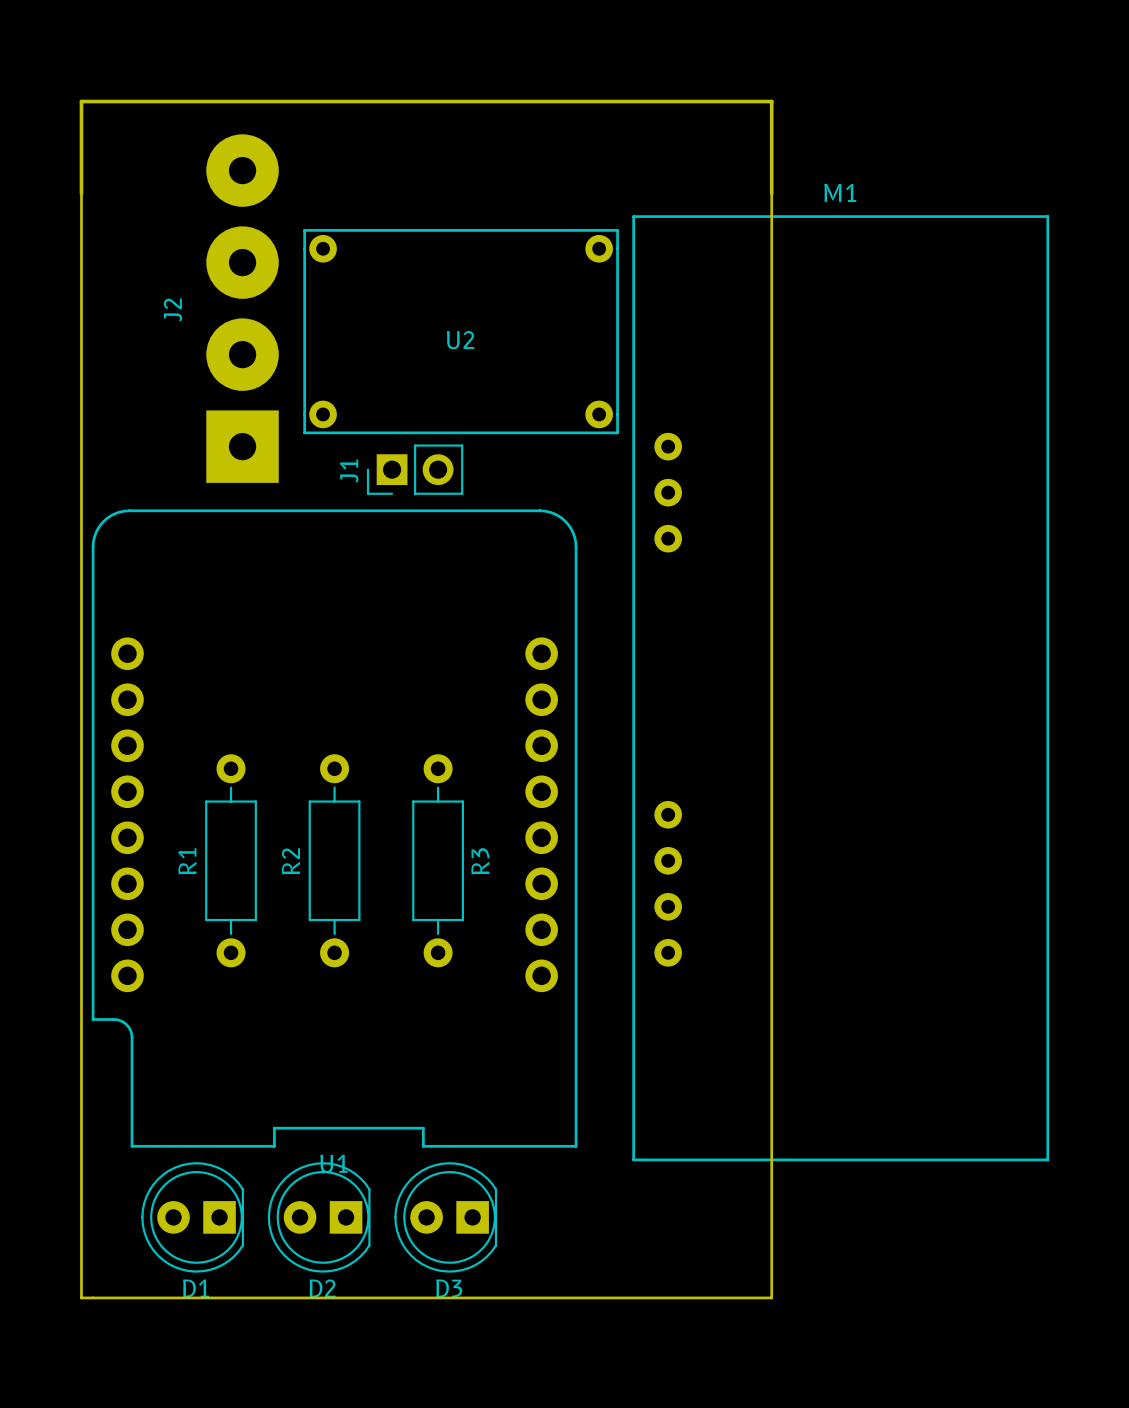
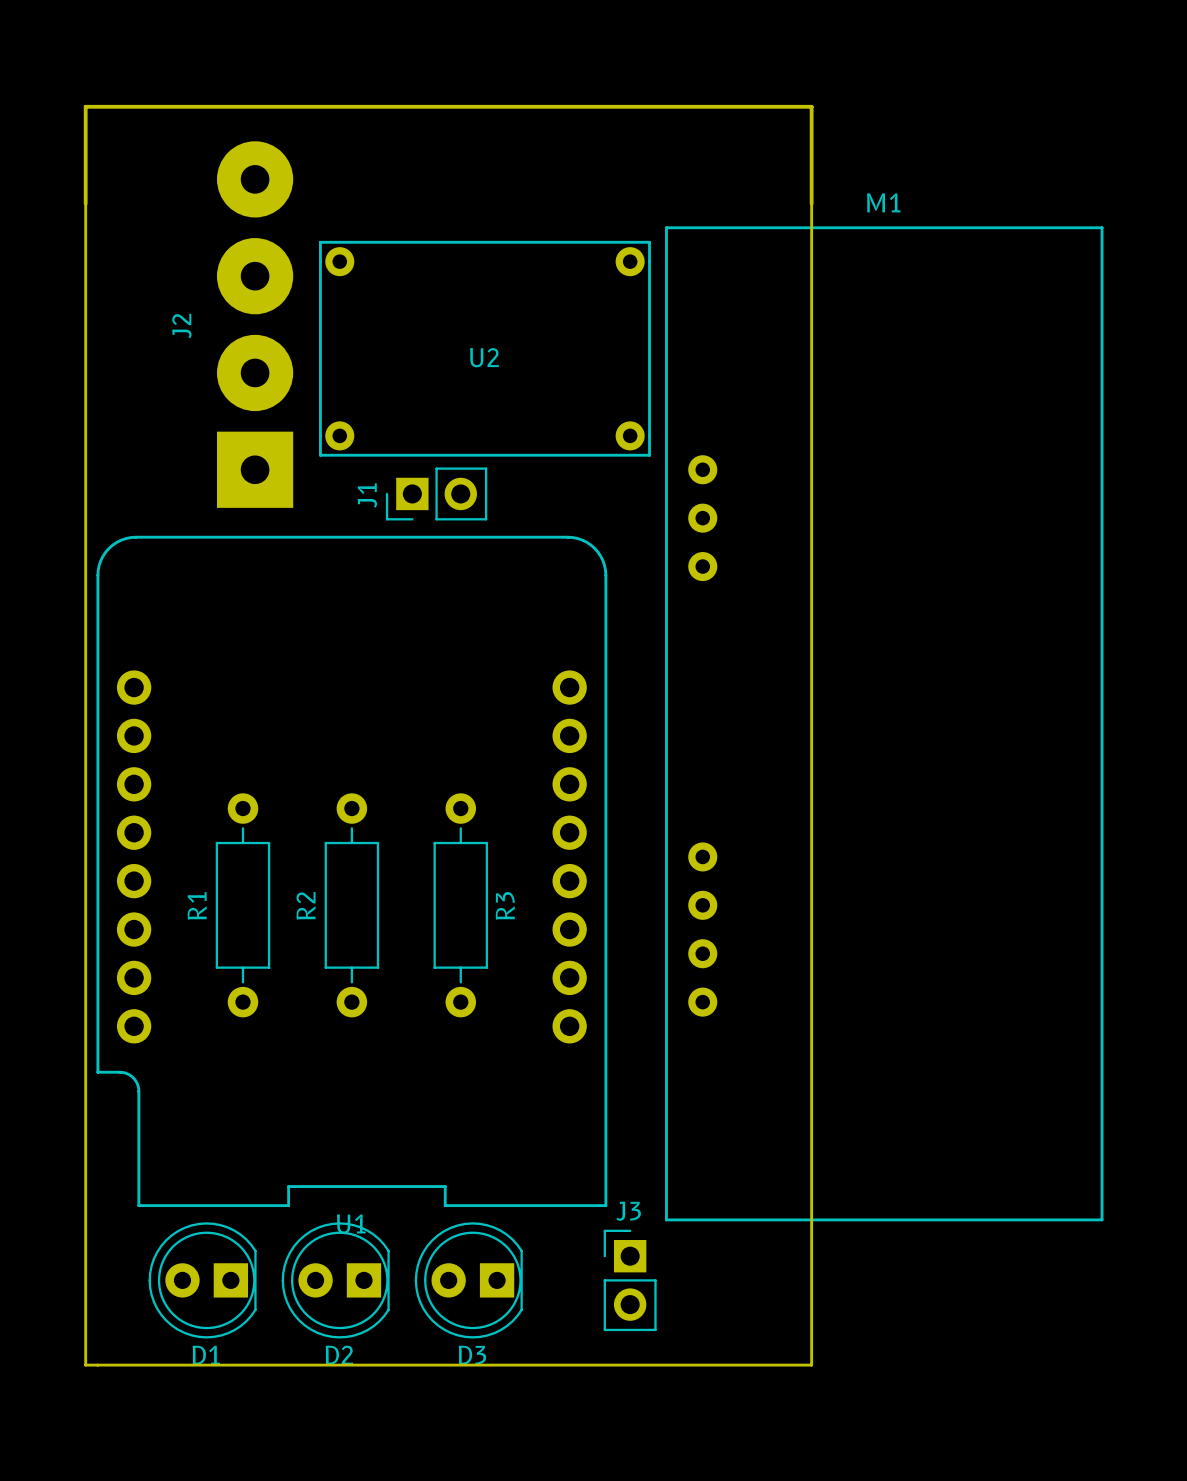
J3: none -> (630, 1280)

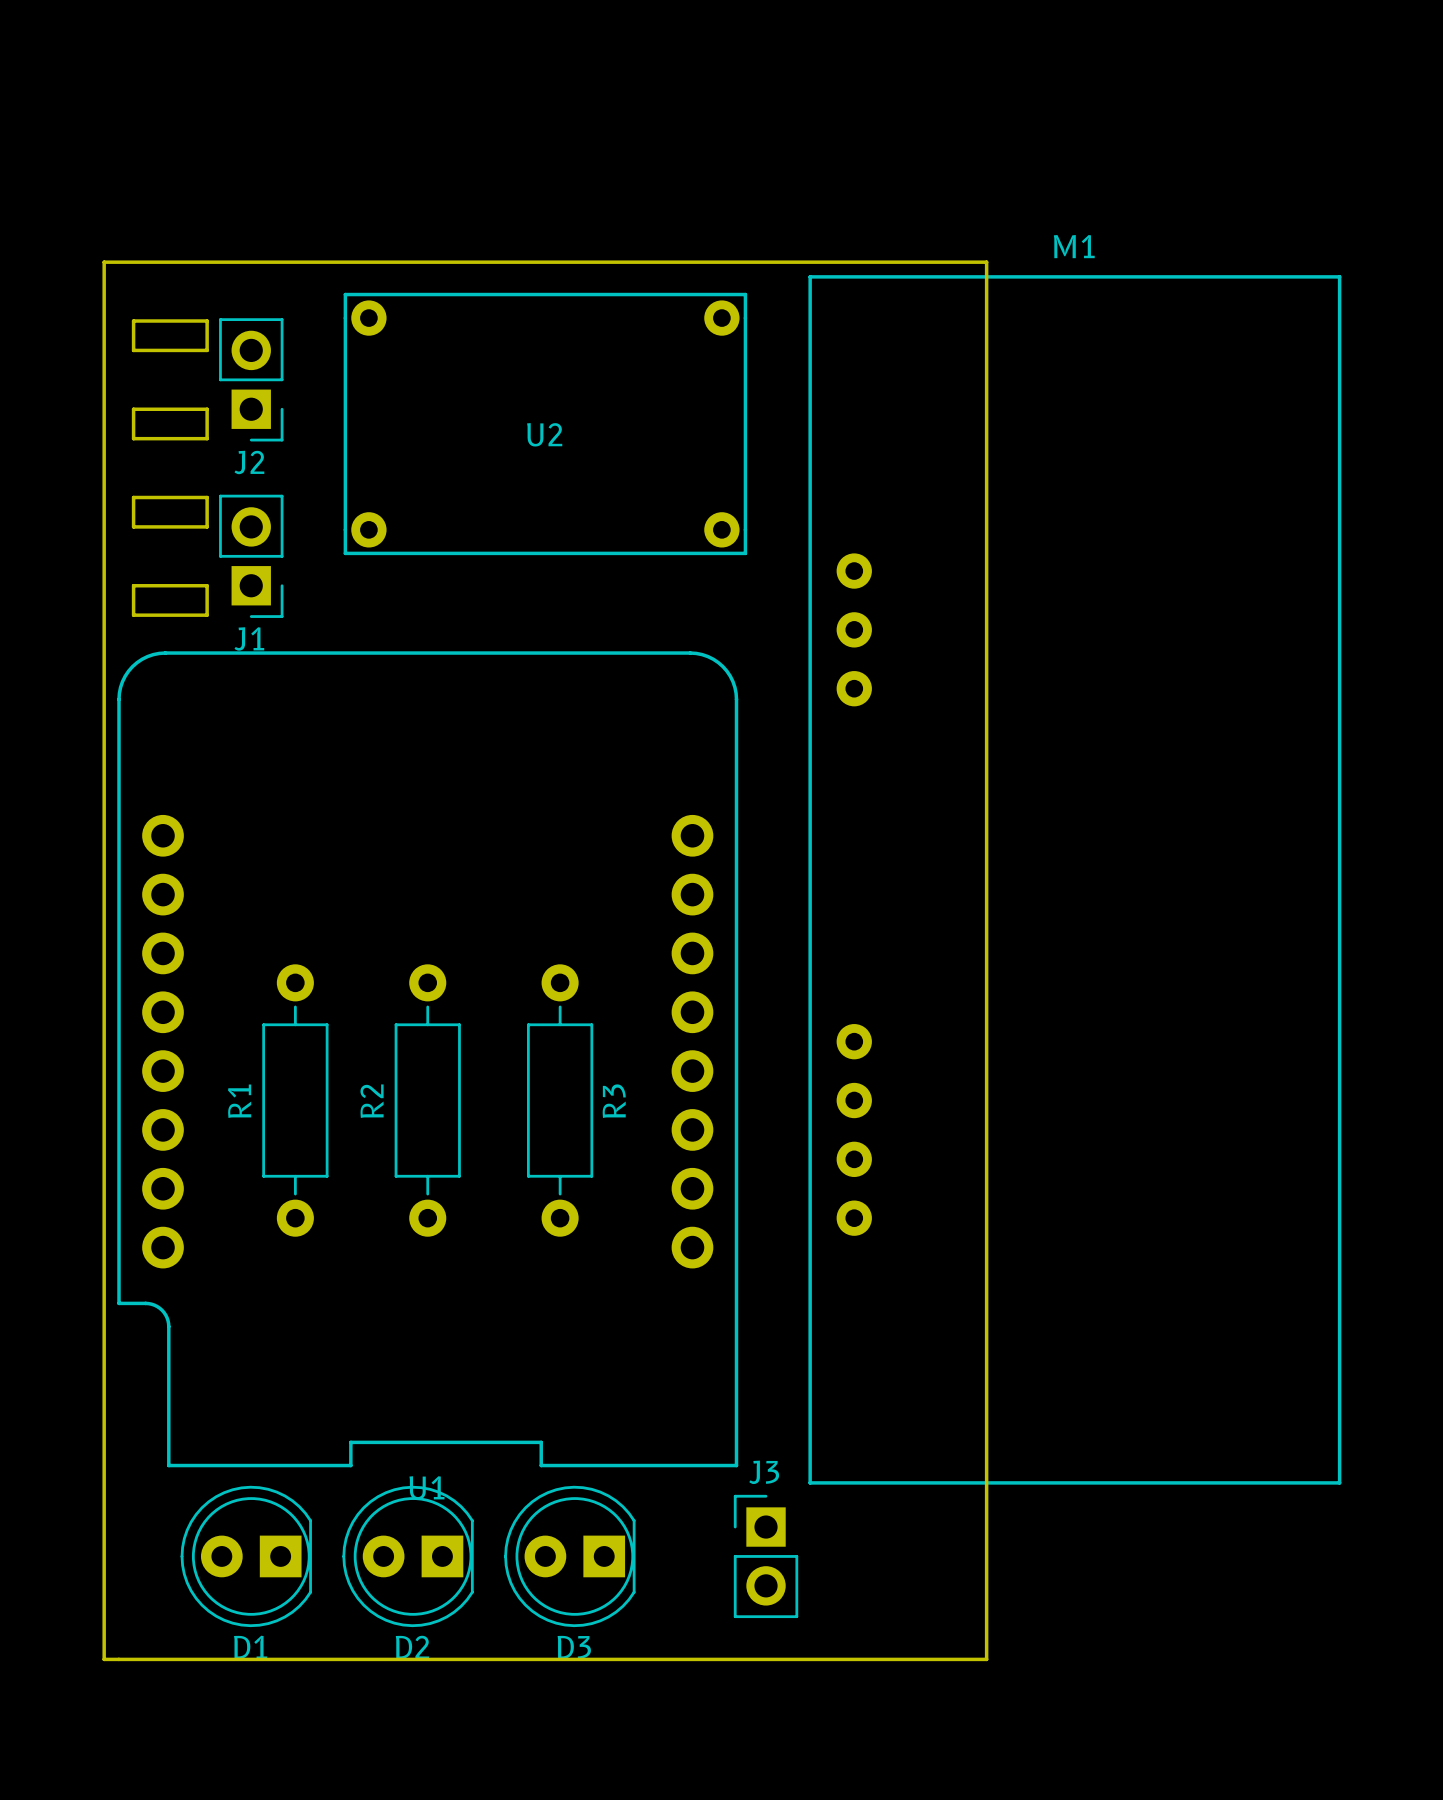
J2 footprint: [216, 141, 294, 508] -> [219, 318, 284, 442]
board edge: (85, 215) (85, 106) (811, 106) (811, 215) -> (104, 262) (986, 262)
board edge: none -> (133, 321) (133, 350) (207, 350) (207, 321) (133, 321)
J2 name position: J2 (181, 326) -> J2 (249, 462)
board edge: none -> (133, 409) (133, 438) (207, 438) (207, 409) (133, 409)
U2 position: (484, 348) -> (545, 423)
board edge: none -> (133, 497) (133, 526) (207, 526) (207, 497) (133, 497)
board edge: none -> (133, 585) (133, 615) (207, 615) (207, 585) (133, 585)
J1 rotation: 0° (436, 493) -> 90° counterclockwise (251, 556)
J1 position: (436, 493) -> (251, 556)

